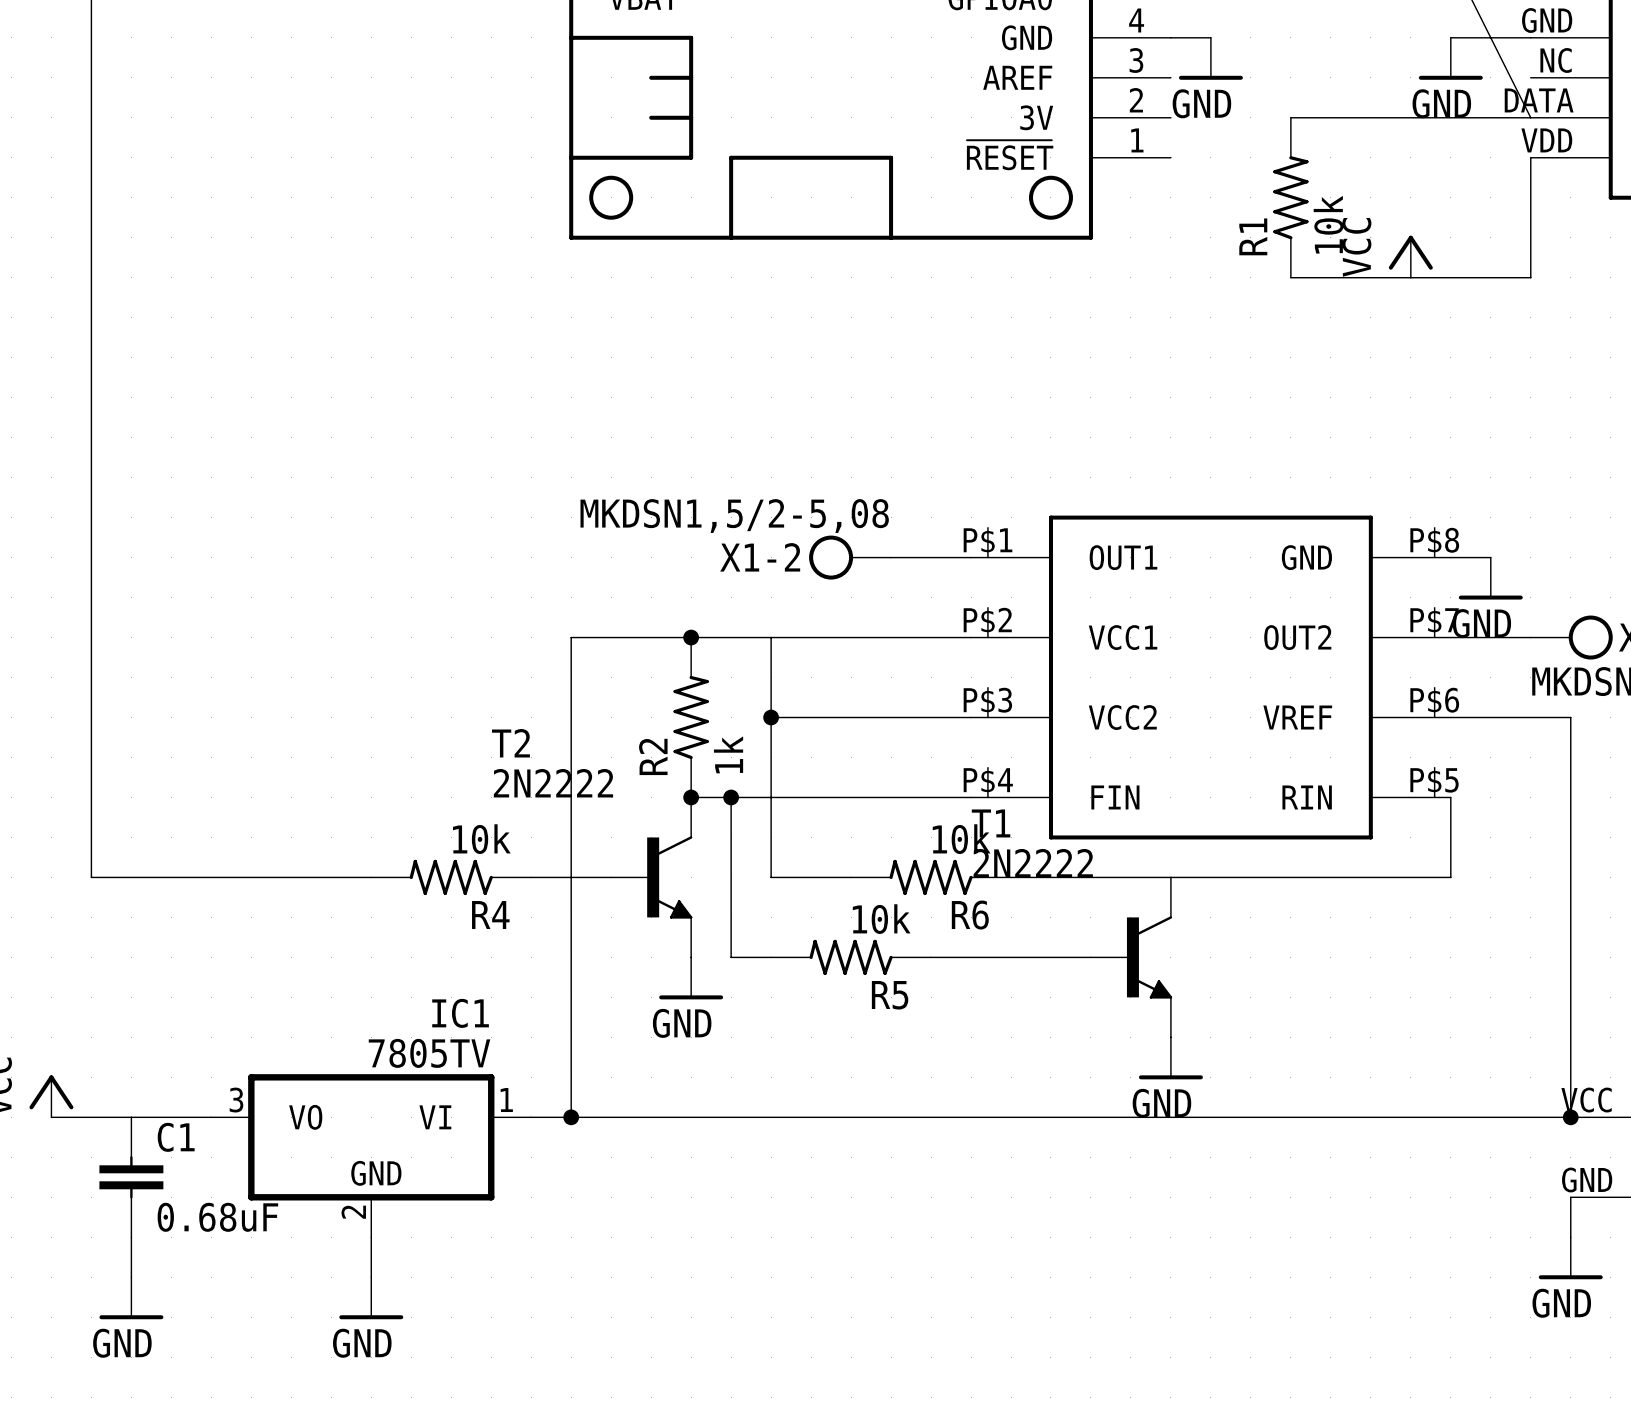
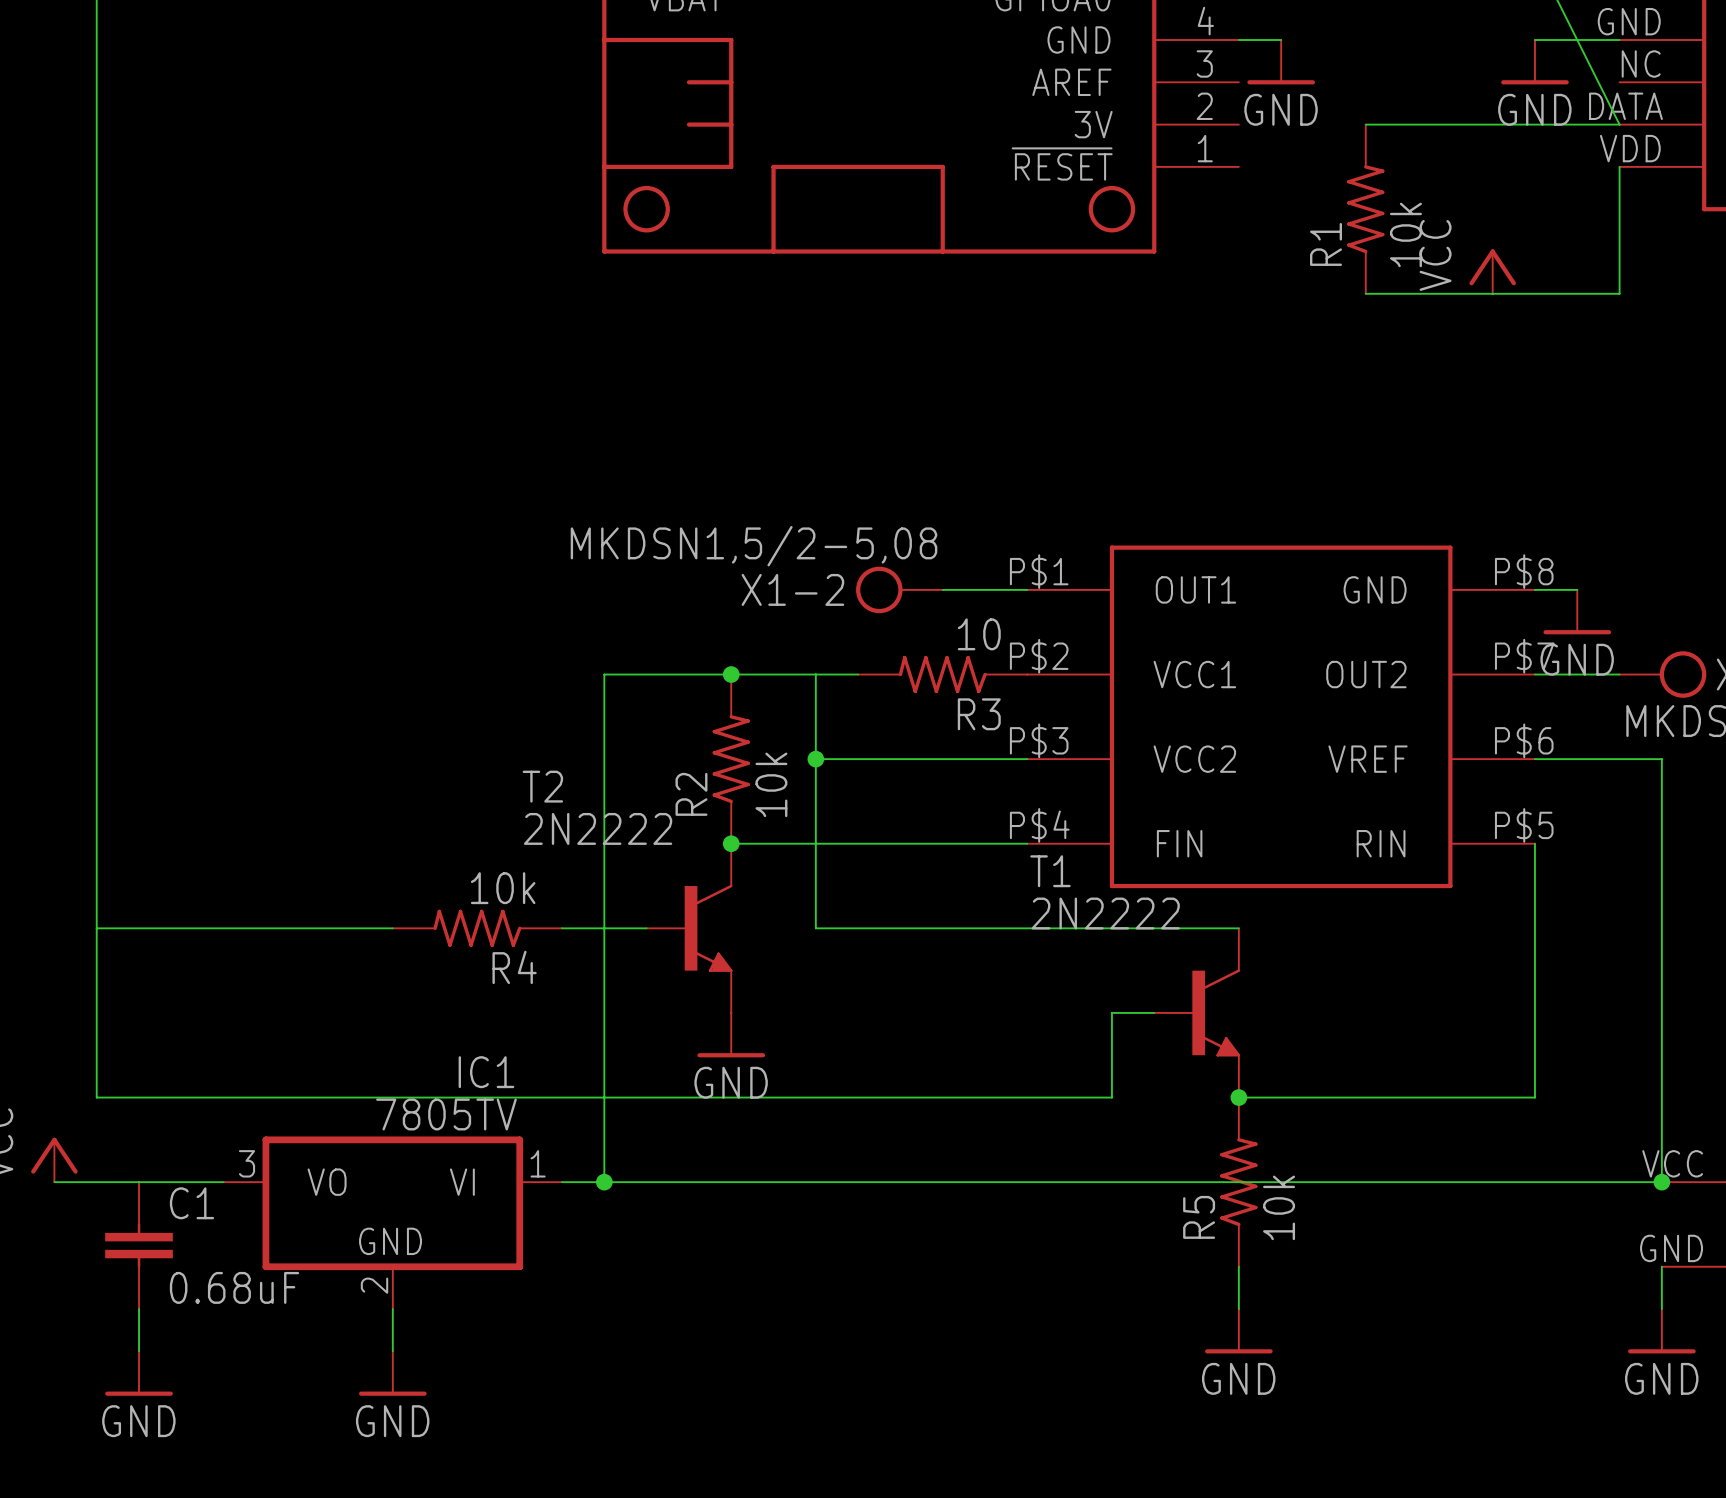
R3: none -> 10 (942, 674)
R2 value: 1k (728, 754) -> 10k (771, 784)
wire: (731, 797) (731, 957) (771, 957) -> none
junction: (731, 797) -> none
R6: 10k (931, 877) -> none
wire: (1170, 877) (1450, 877) -> (1238, 1097) (1534, 1097) (1534, 928)
R5 rotation: 0° (851, 957) -> 90° clockwise (1238, 1182)
R5 position: (851, 957) -> (1238, 1182)
wire: (931, 957) (1050, 957) -> (96, 928) (96, 1097) (1111, 1097) (1111, 1012)
junction: none -> (1238, 1097)
power symbol position: GND (1170, 1058) -> GND (1238, 1331)
wire: none -> (1238, 1266) (1238, 1309)

